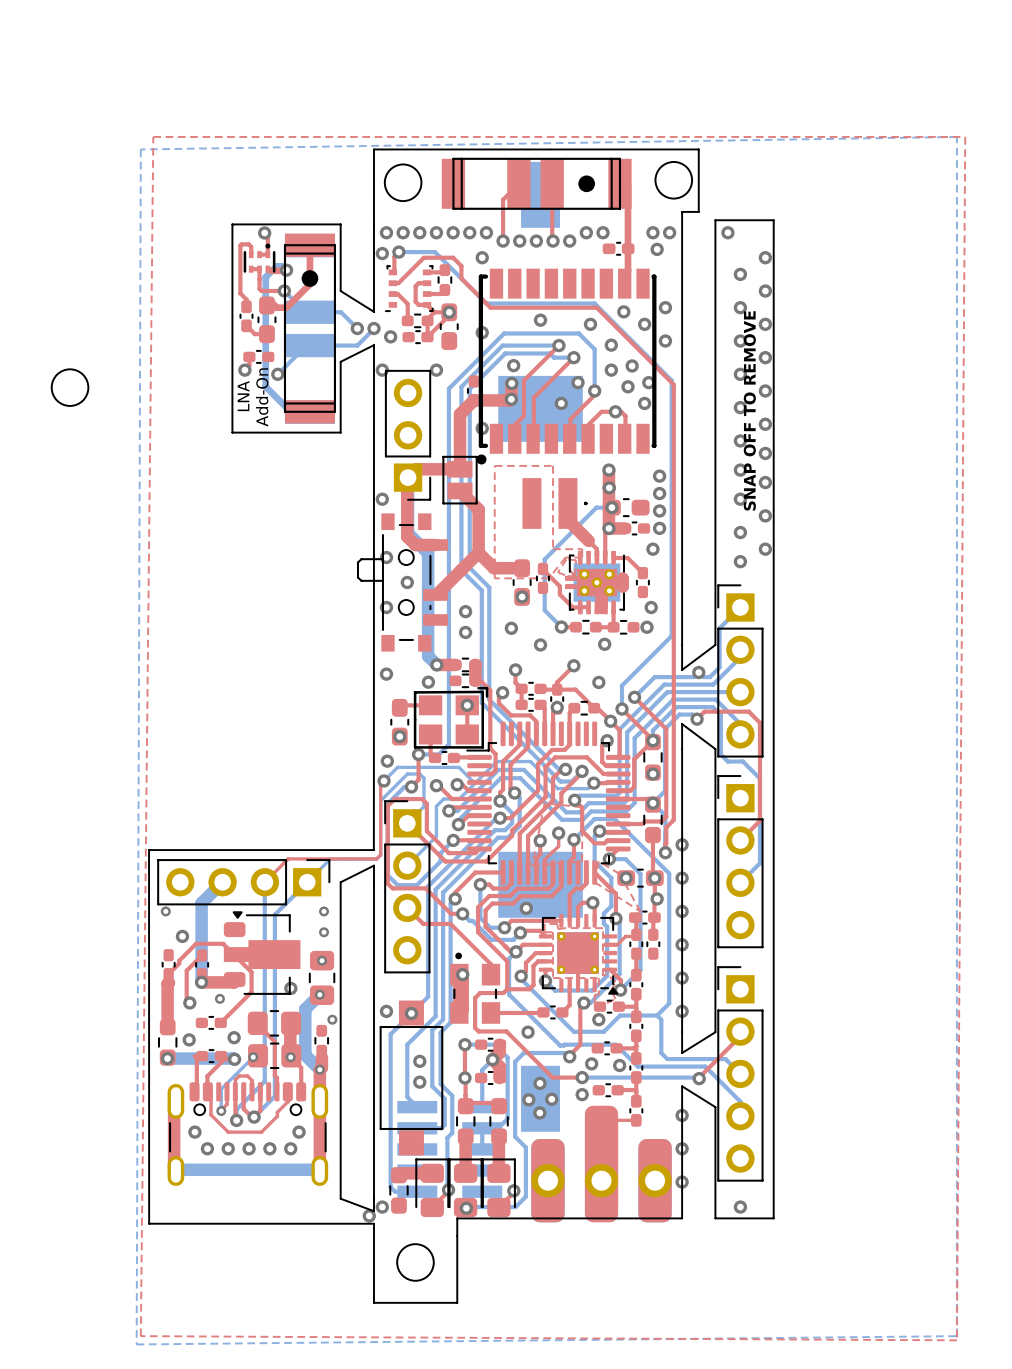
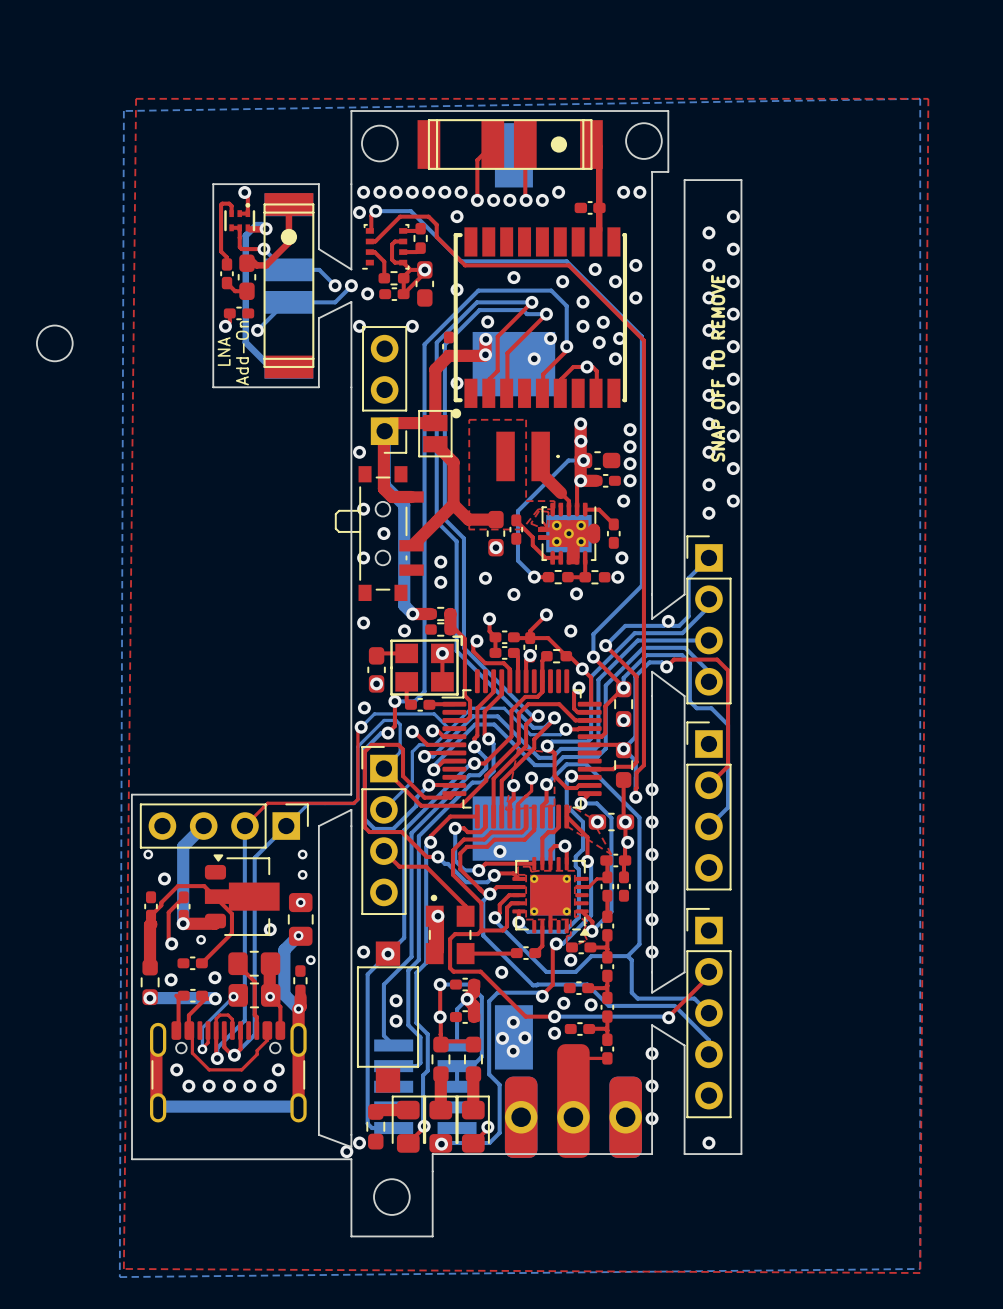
via: (603, 232) -> none
via: (727, 232) -> none
via: (657, 249) -> none

